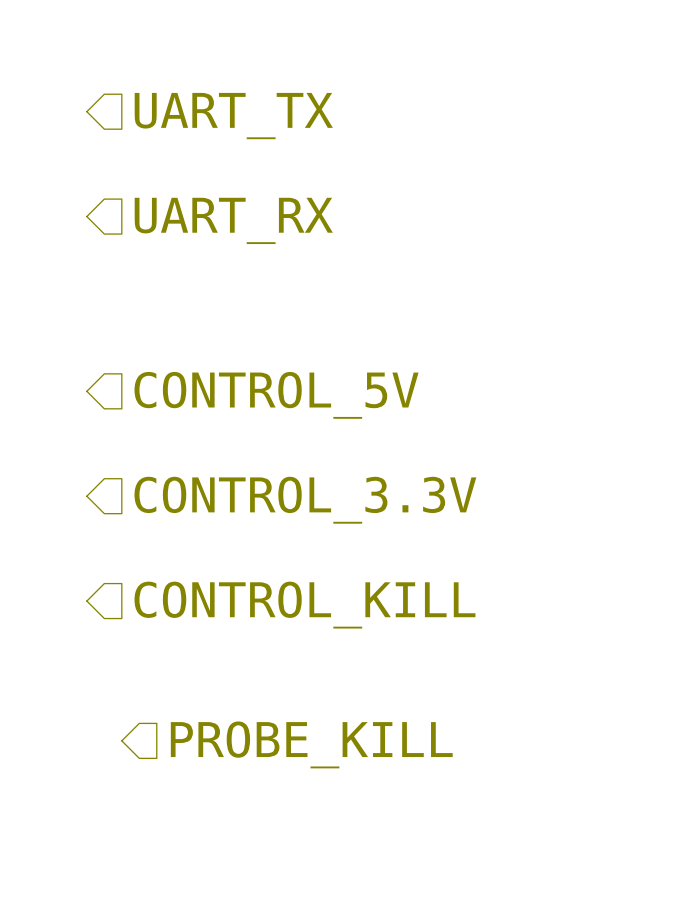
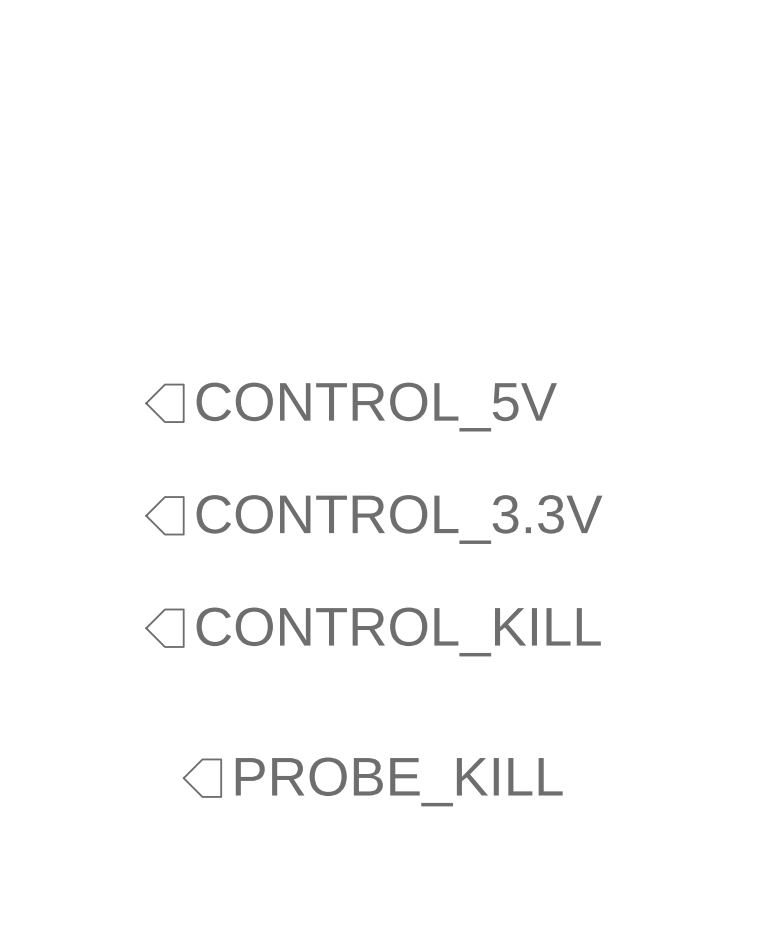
hierarchical label: UART_TX (233, 116) -> none
hierarchical label: UART_RX (233, 220) -> none

